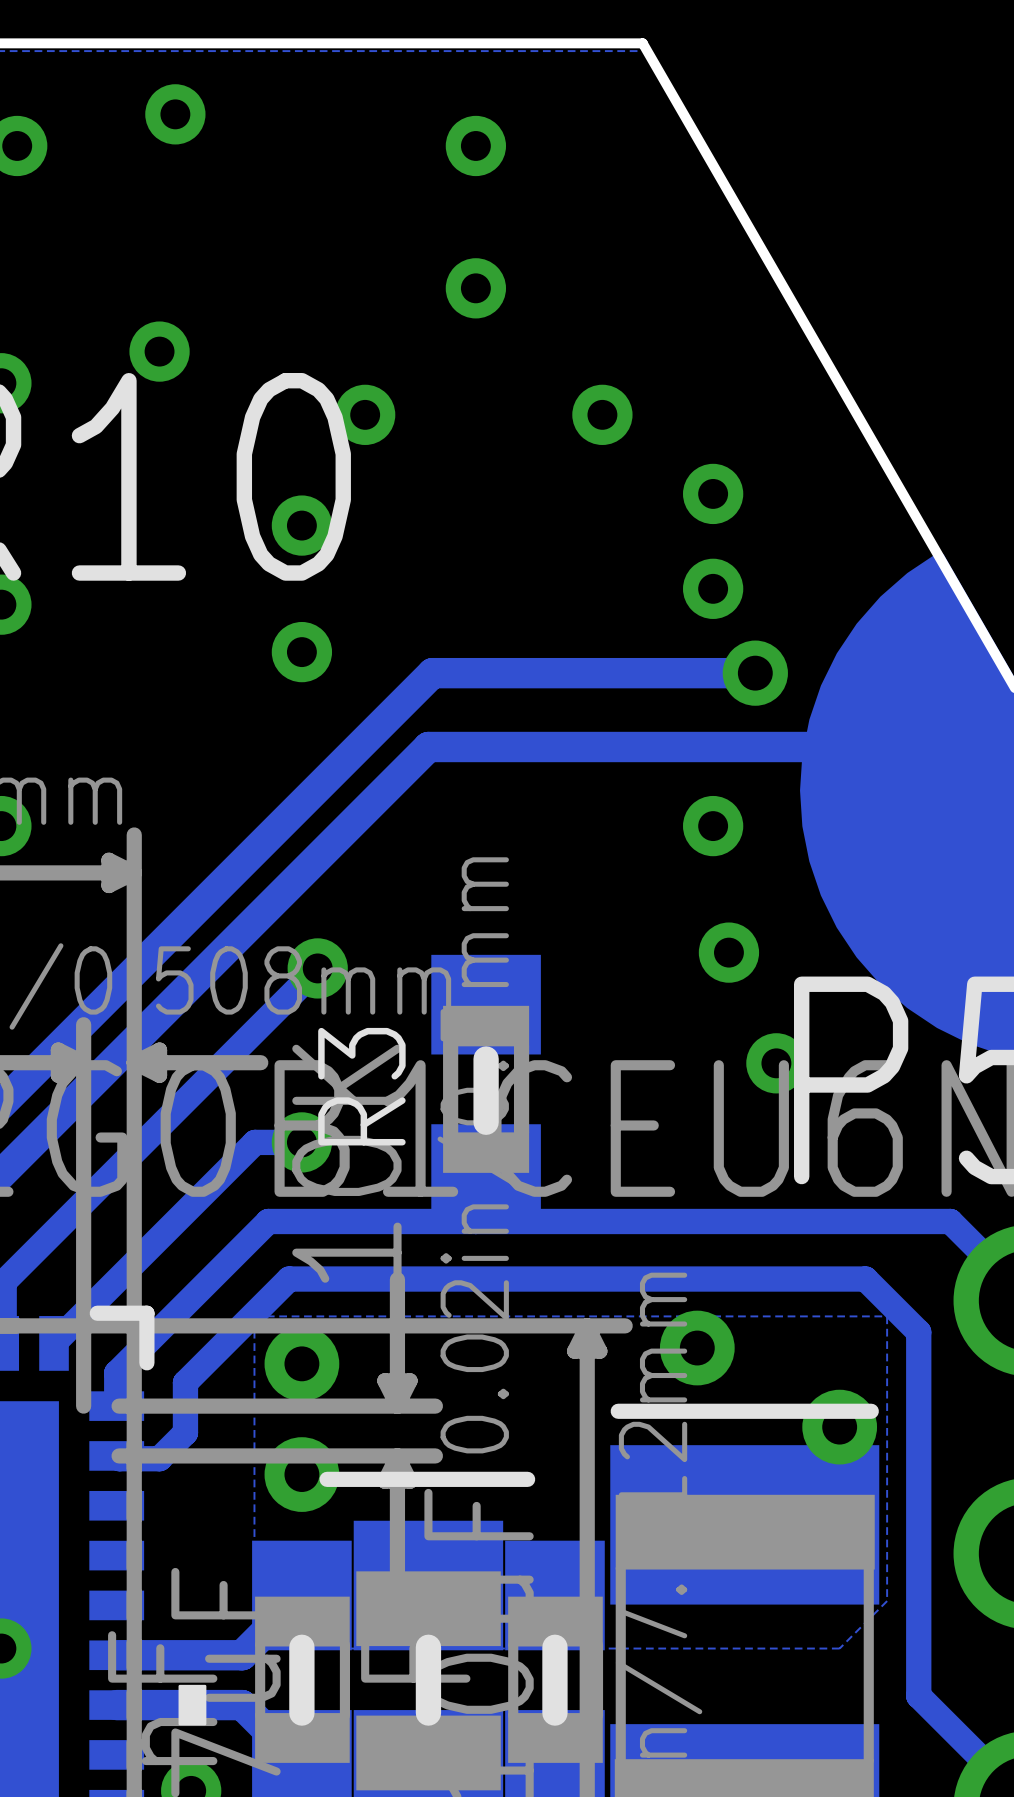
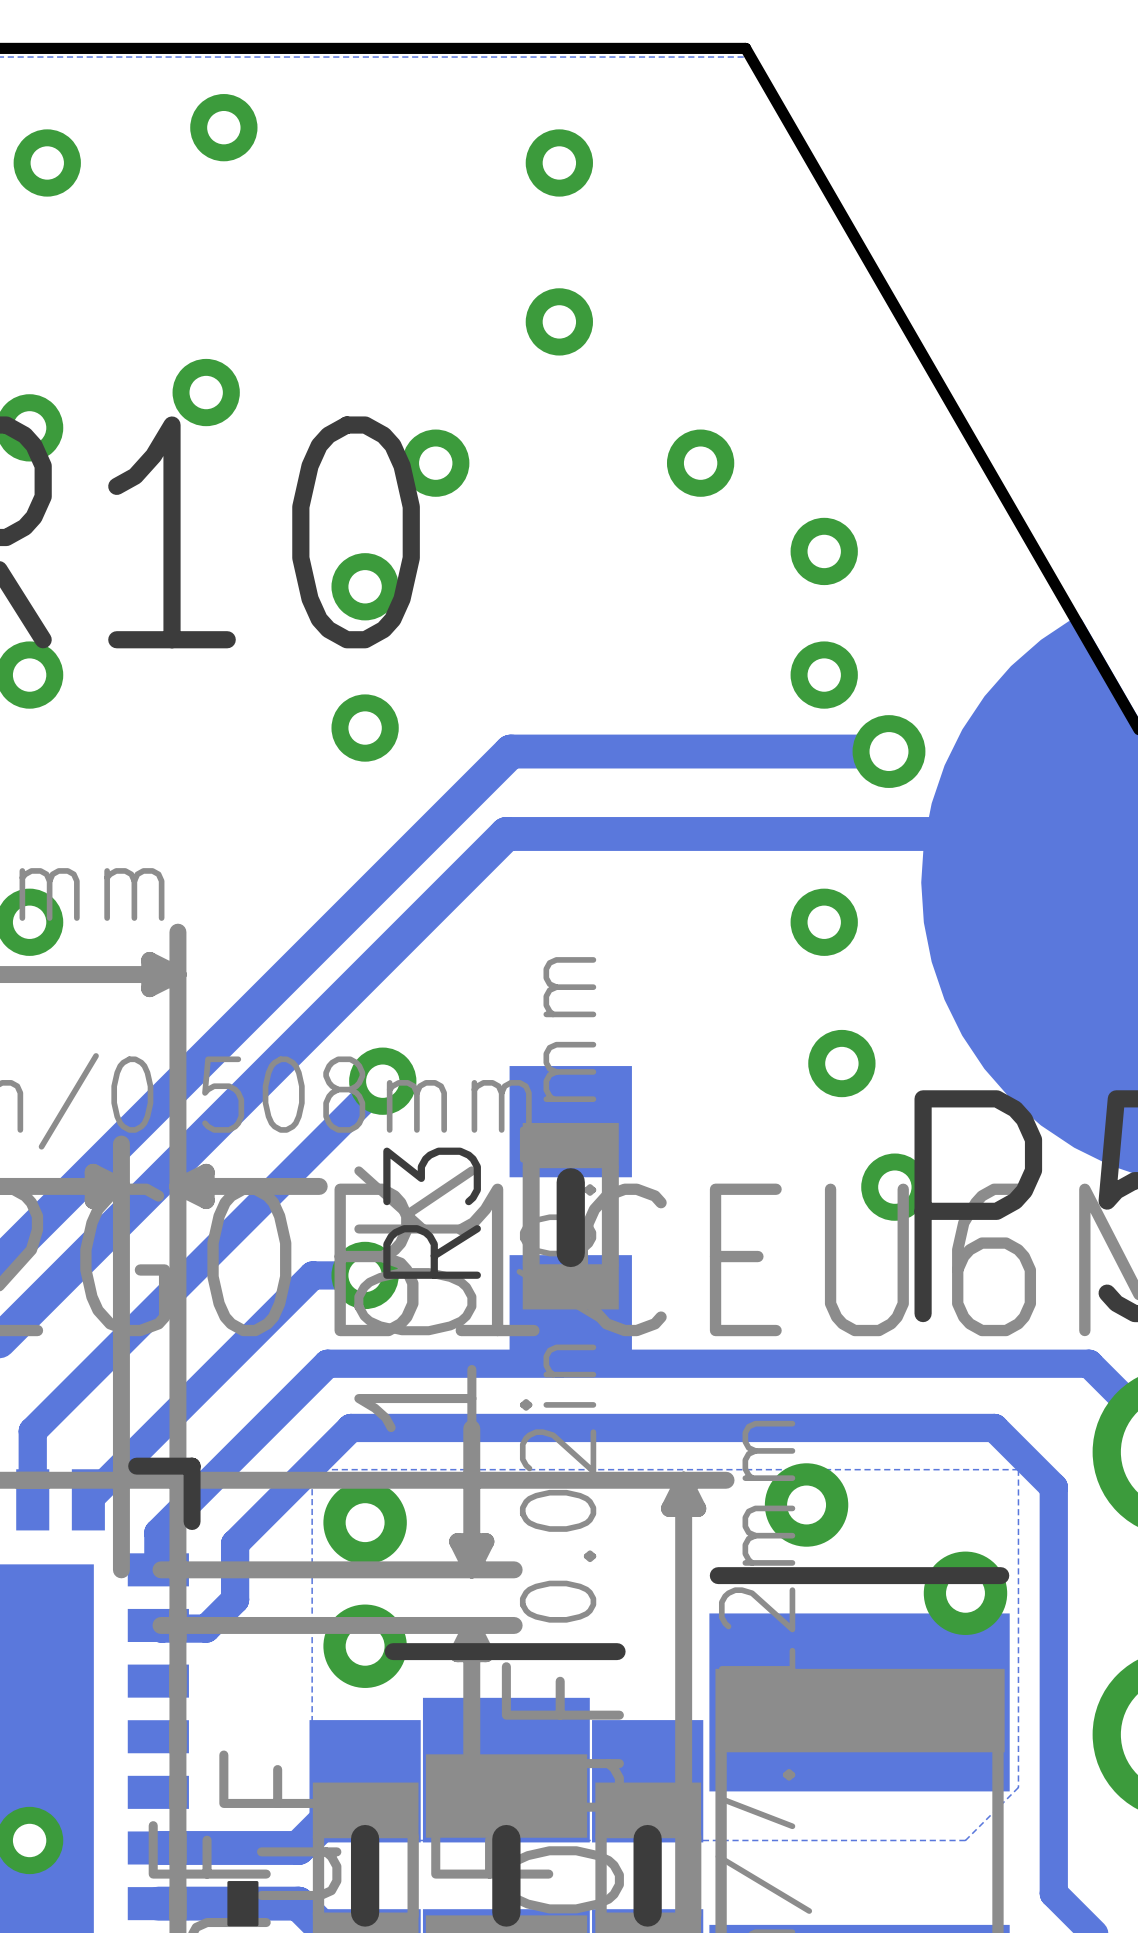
via position: (713, 588) -> (824, 675)
via position: (755, 673) -> (888, 751)

